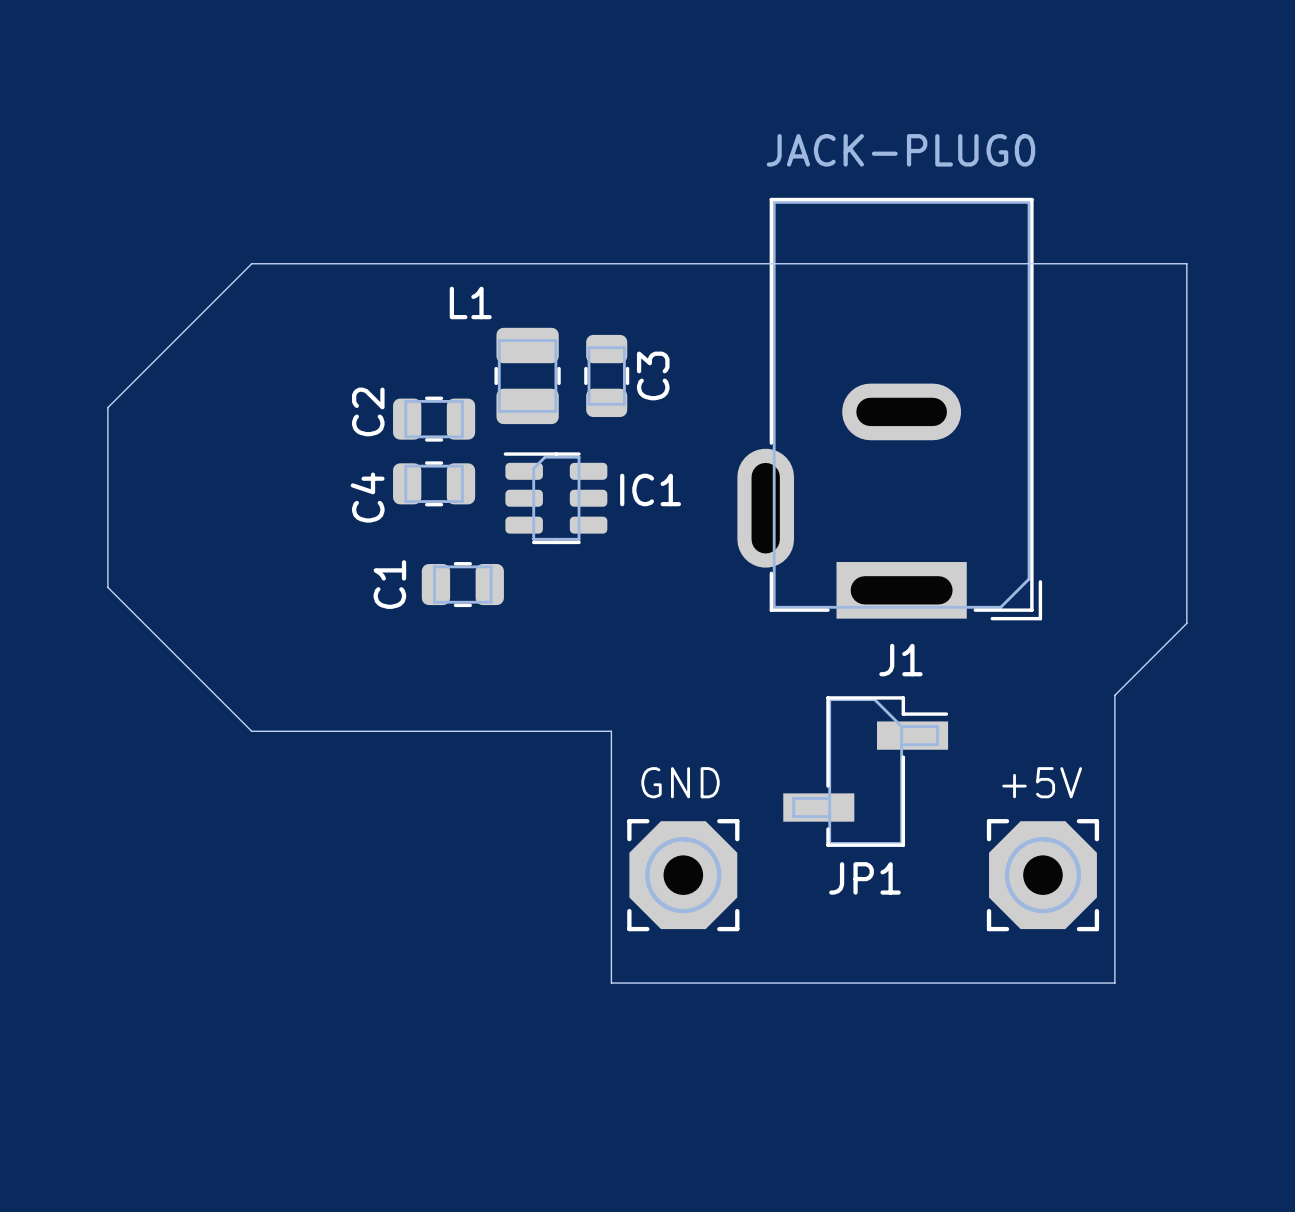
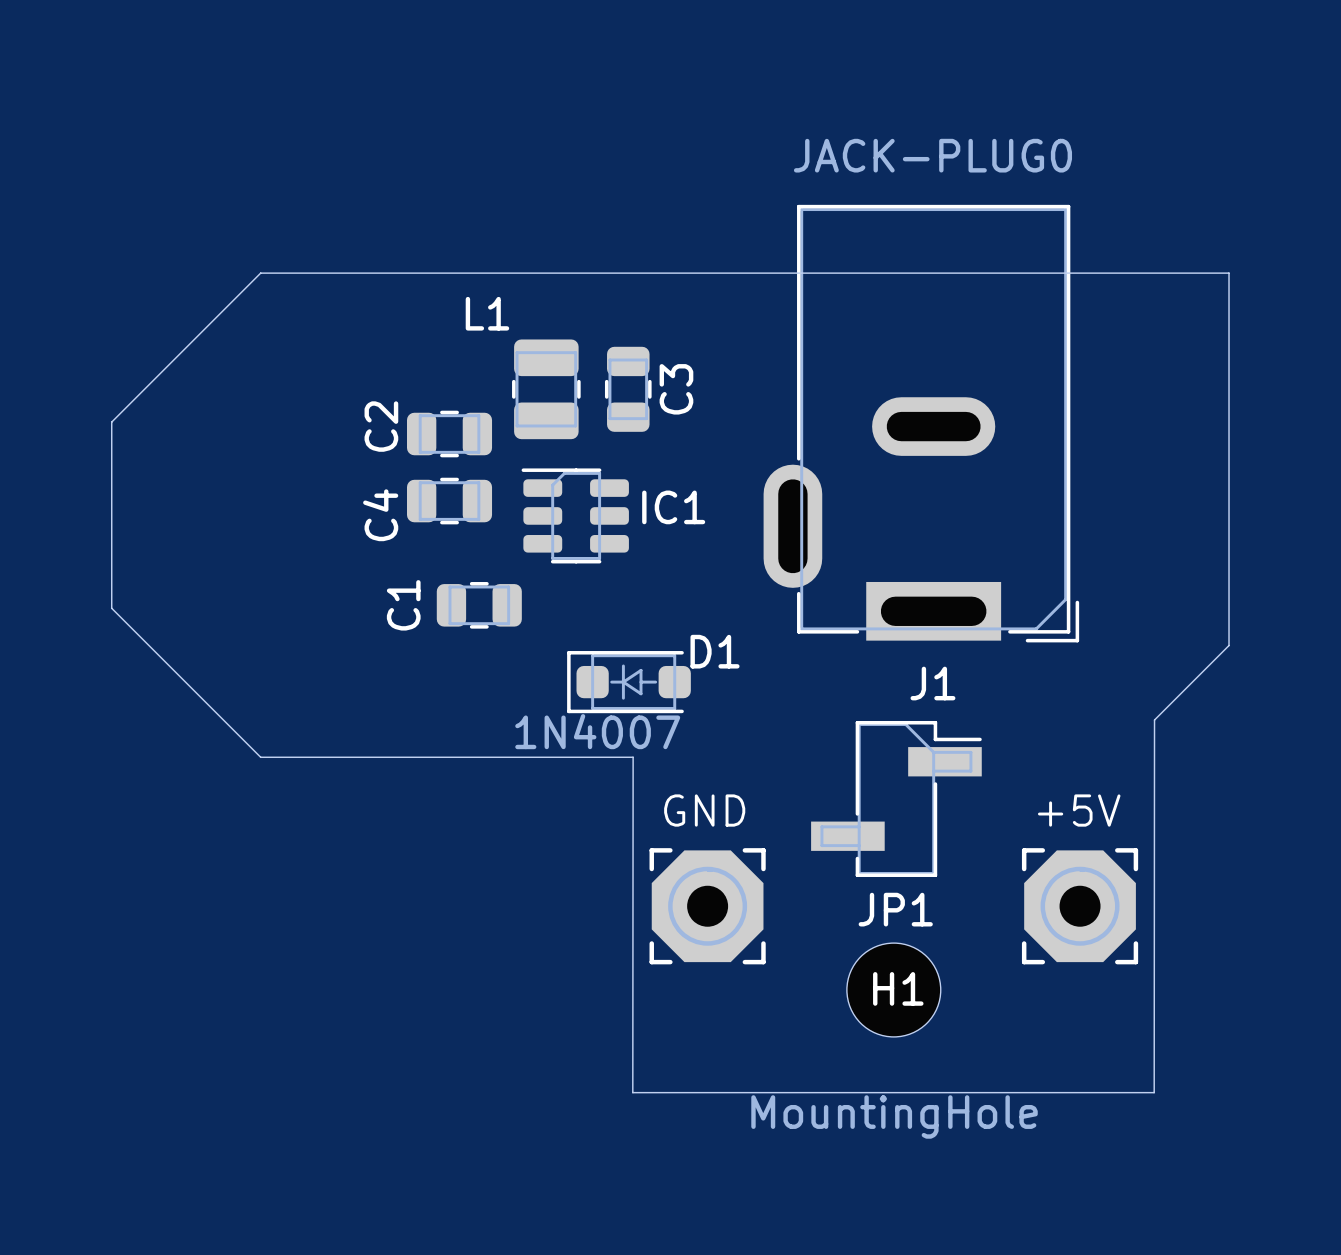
D1: none -> 1N4007 (628, 682)
board edge: (1114, 695) (1114, 983) (611, 983) (611, 731) -> (1154, 720) (1154, 1092) (632, 1092) (633, 757)
H1: none -> MountingHole (893, 990)

